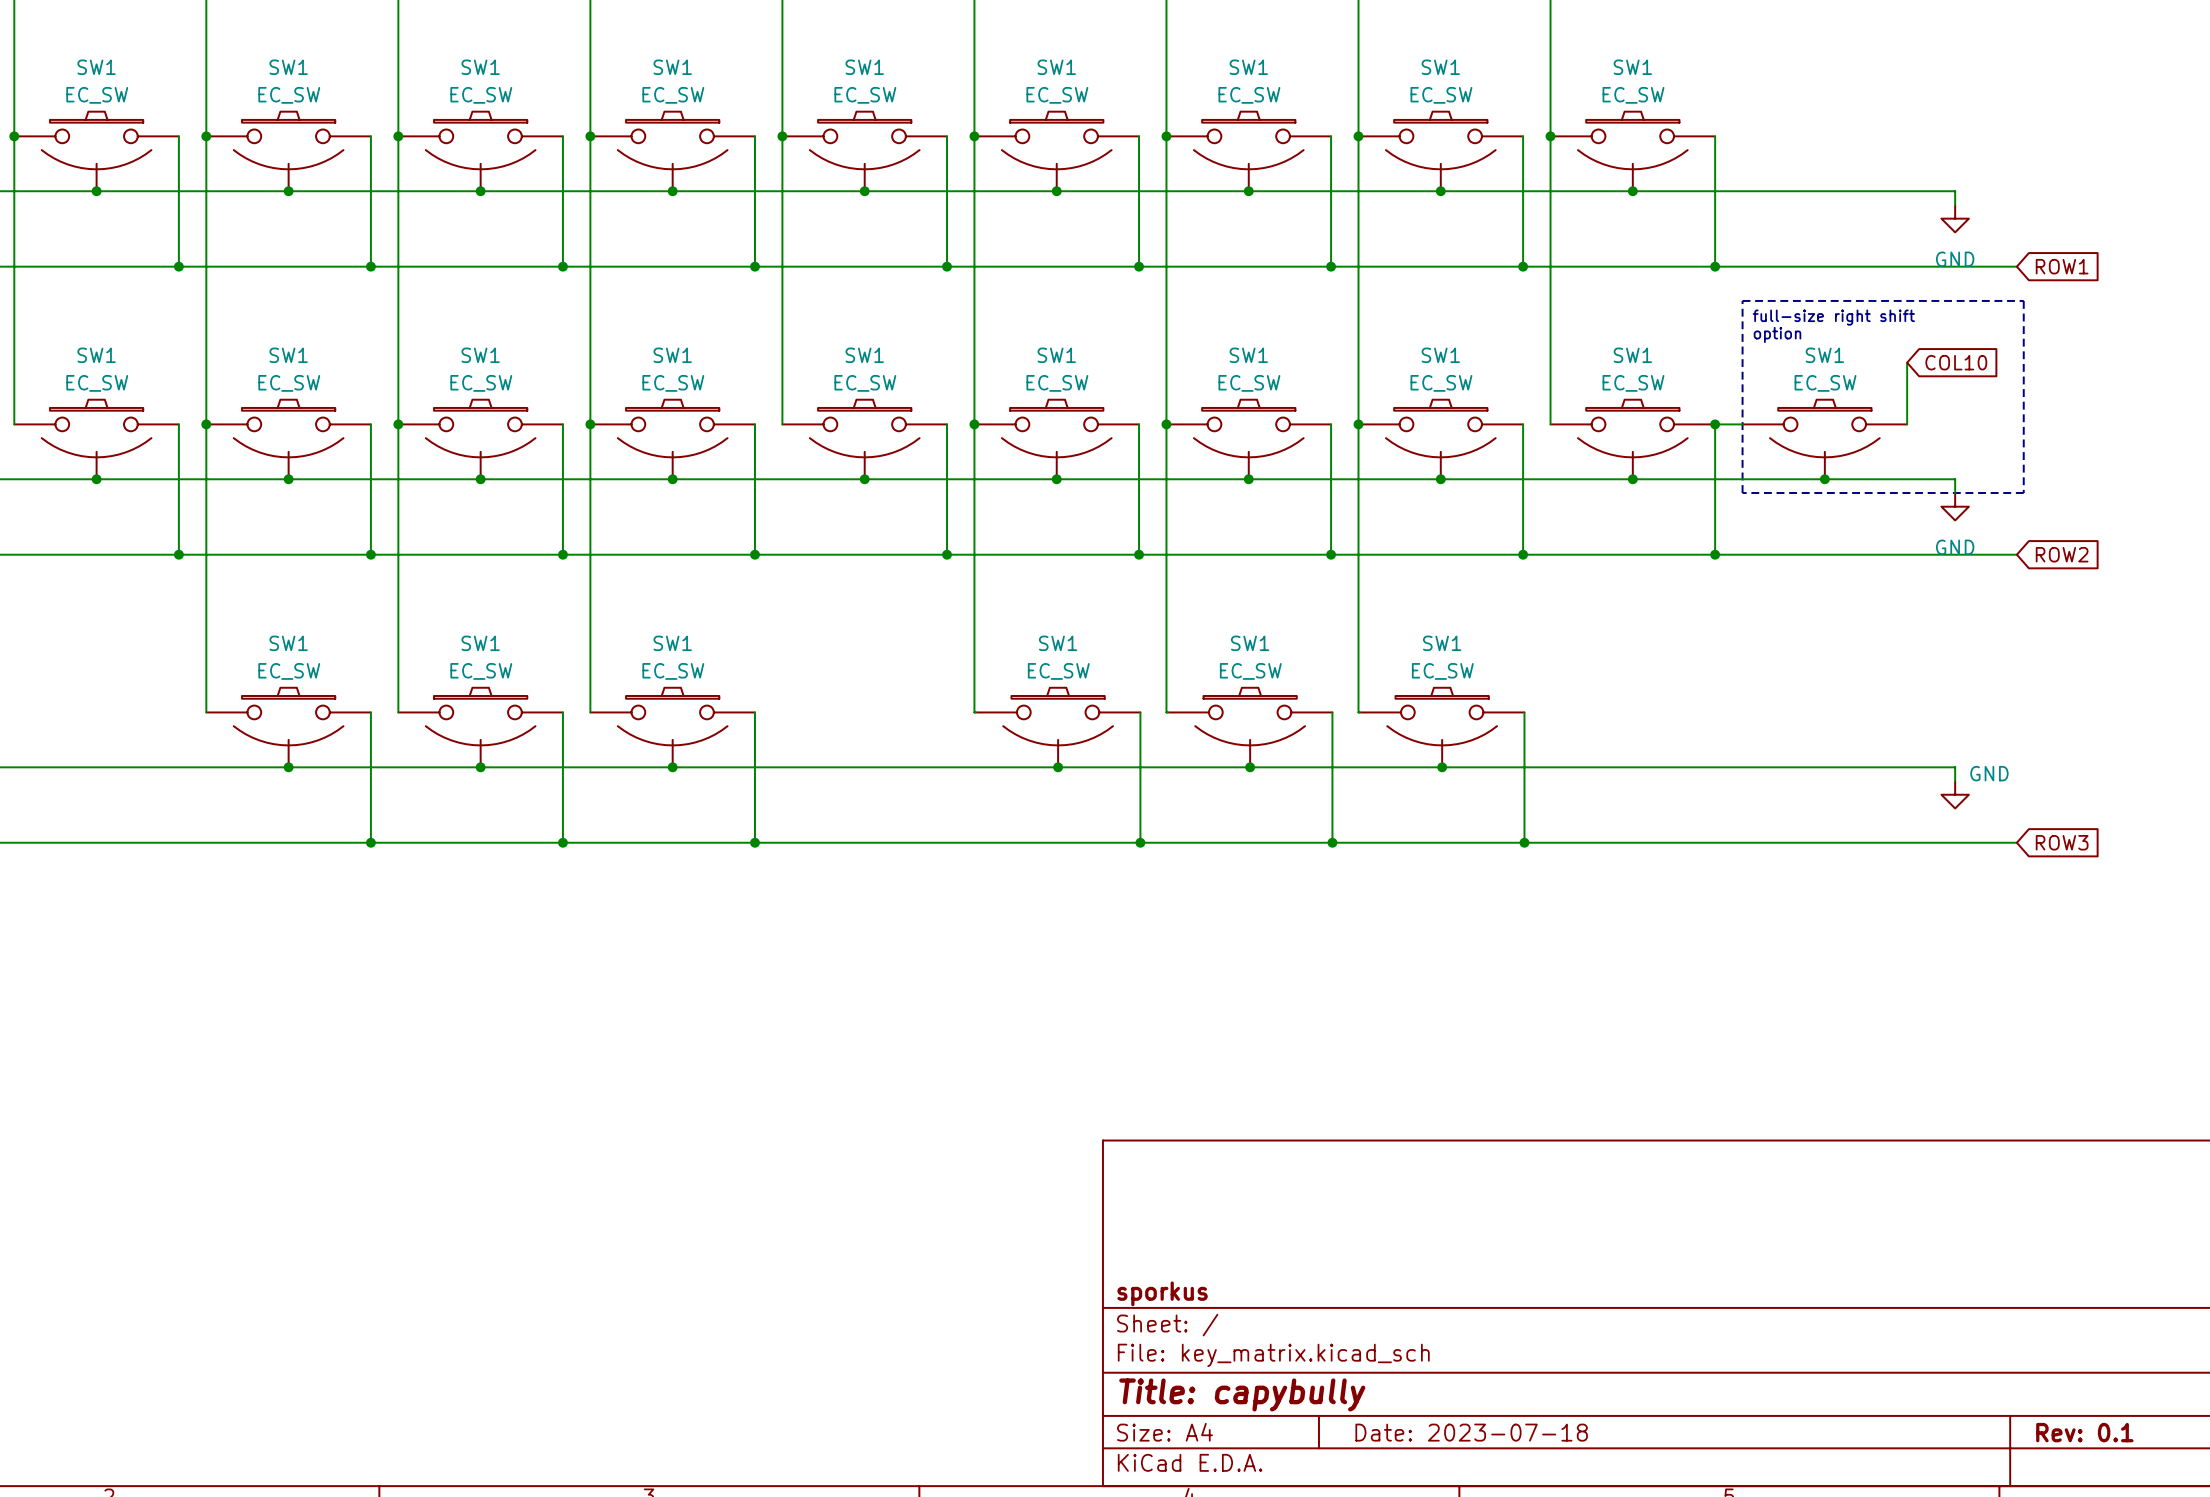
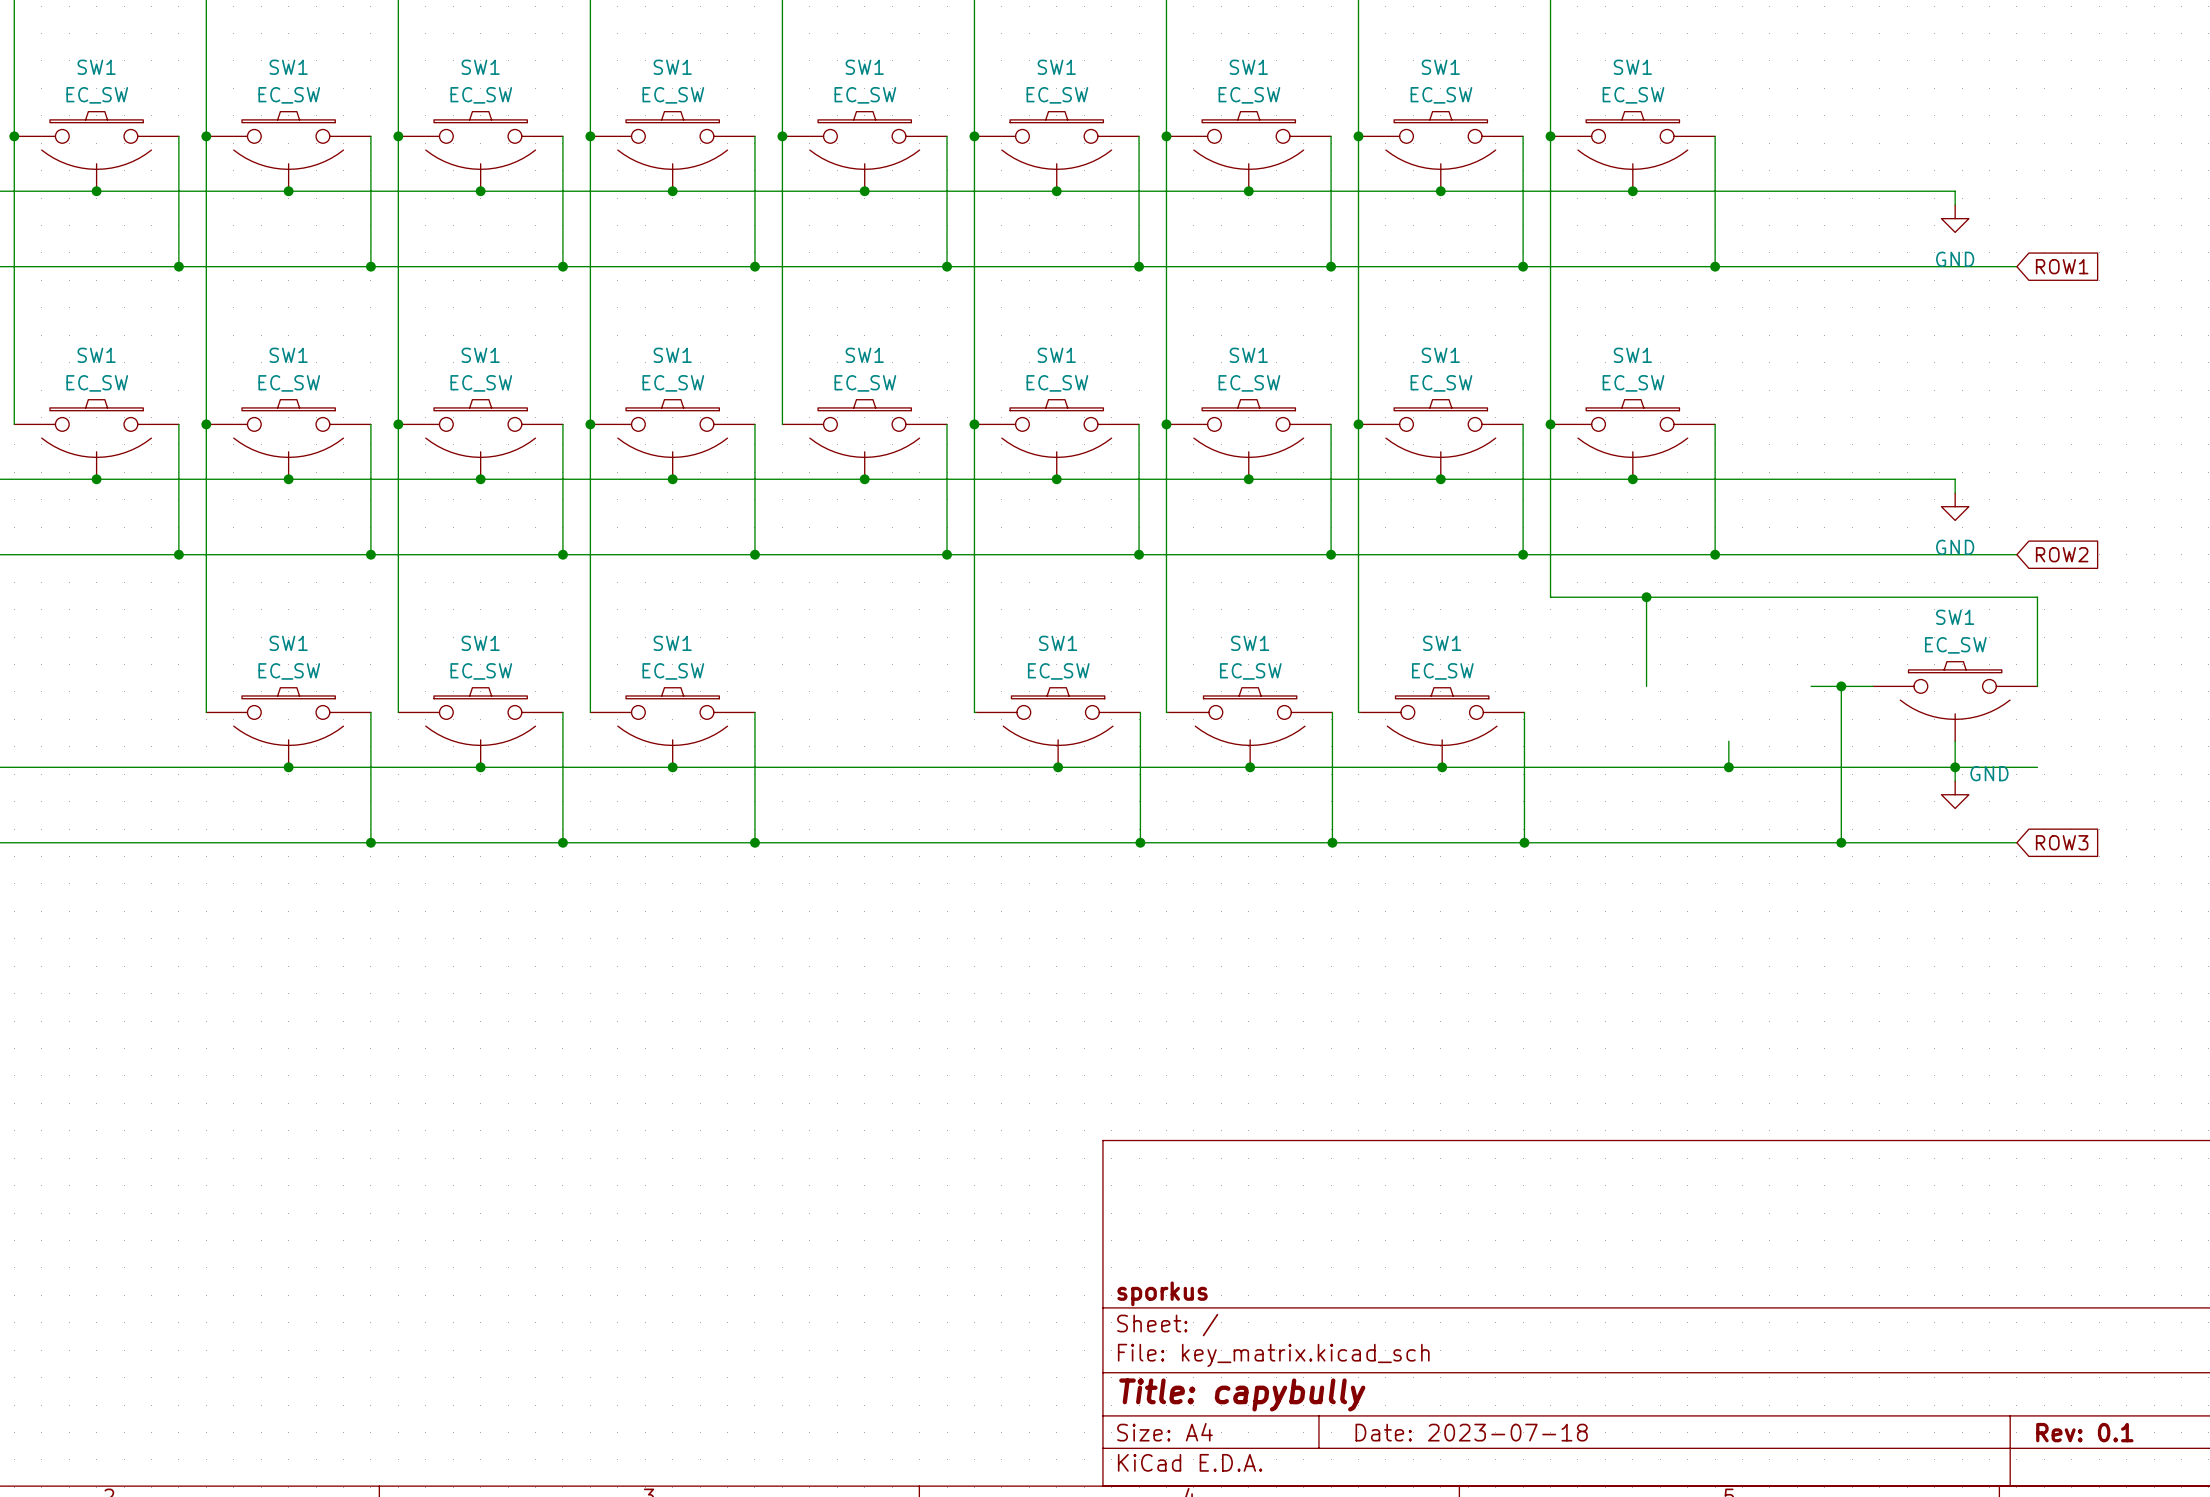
line: (1742, 300) (2023, 300) (2023, 492) (1742, 492) (1742, 300) -> none
text: full-size right shift (1833, 317) -> none
text: option (1777, 334) -> none
wire: (1907, 362) (1907, 424) -> none
global label: COL10 (1956, 362) -> none
wire: none -> (1550, 424) (1550, 597) (2037, 597) (2037, 686)
junction: none -> (1550, 424)
wire: (1715, 424) (1742, 424) -> none
junction: (1715, 424) -> none
SW1: EC_SW (1824, 439) -> none
junction: (1824, 479) -> none
wire: none -> (1646, 597) (1646, 686)
junction: none -> (1646, 597)
wire: none -> (1811, 686) (1872, 686)
wire: none -> (1841, 686) (1841, 842)
junction: none -> (1841, 686)
SW1: none -> EC_SW (1955, 701)
wire: none -> (1728, 741) (1728, 767)
wire: none -> (1955, 741) (1955, 767) (2037, 767)
junction: none -> (1728, 767)
junction: none -> (1955, 767)
junction: none -> (1841, 842)

